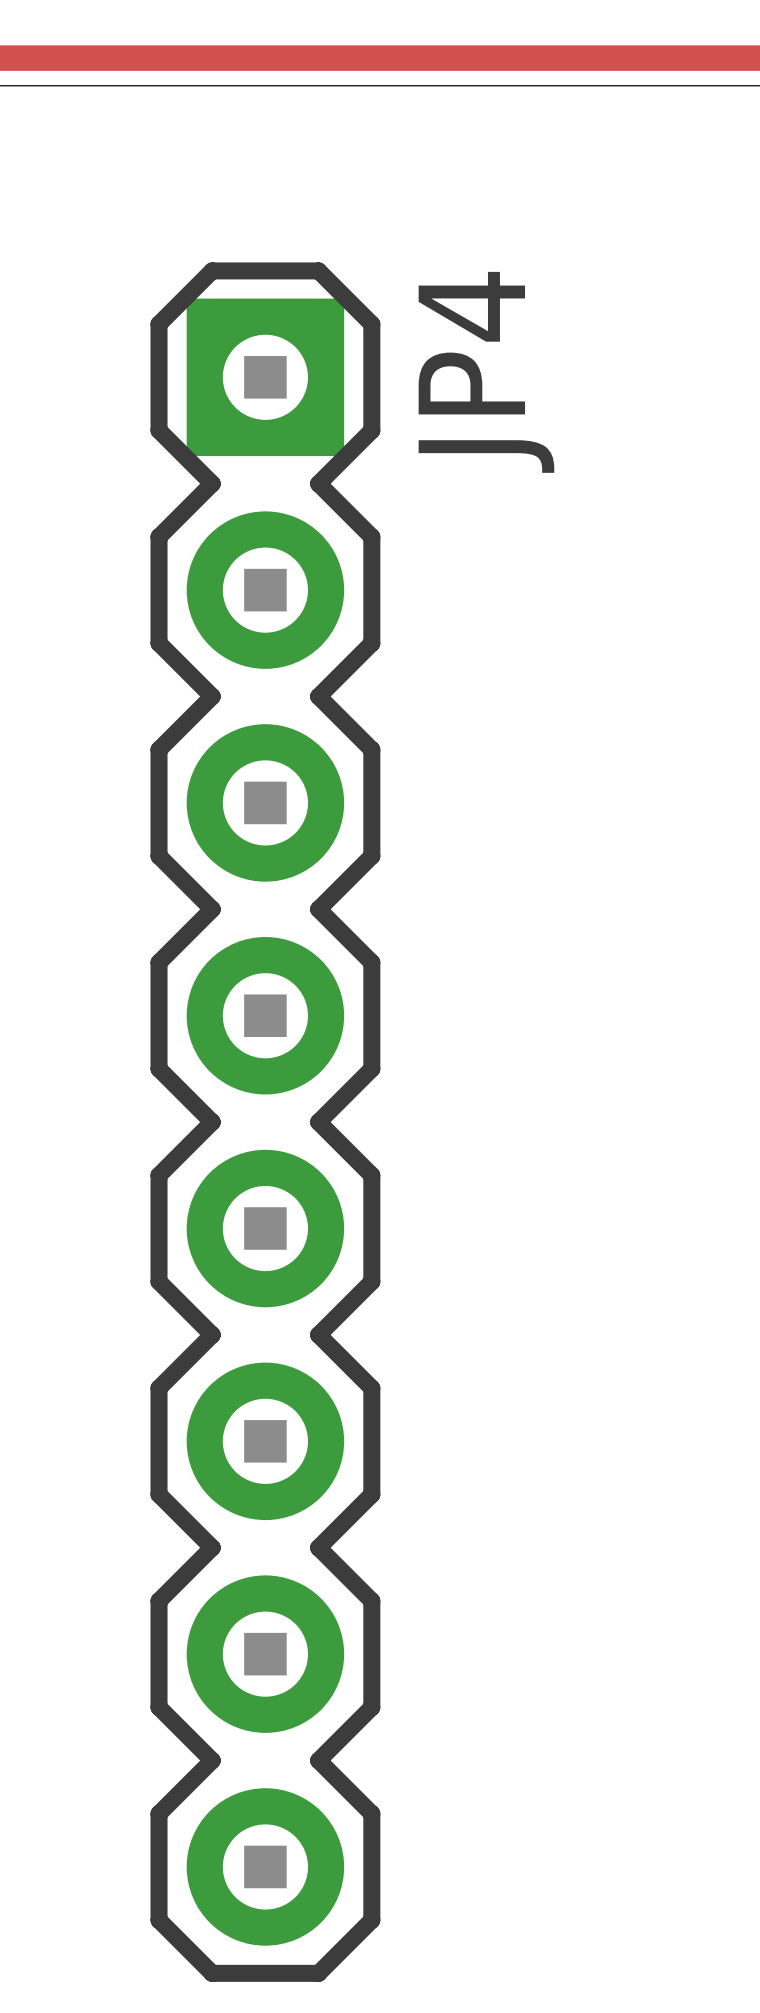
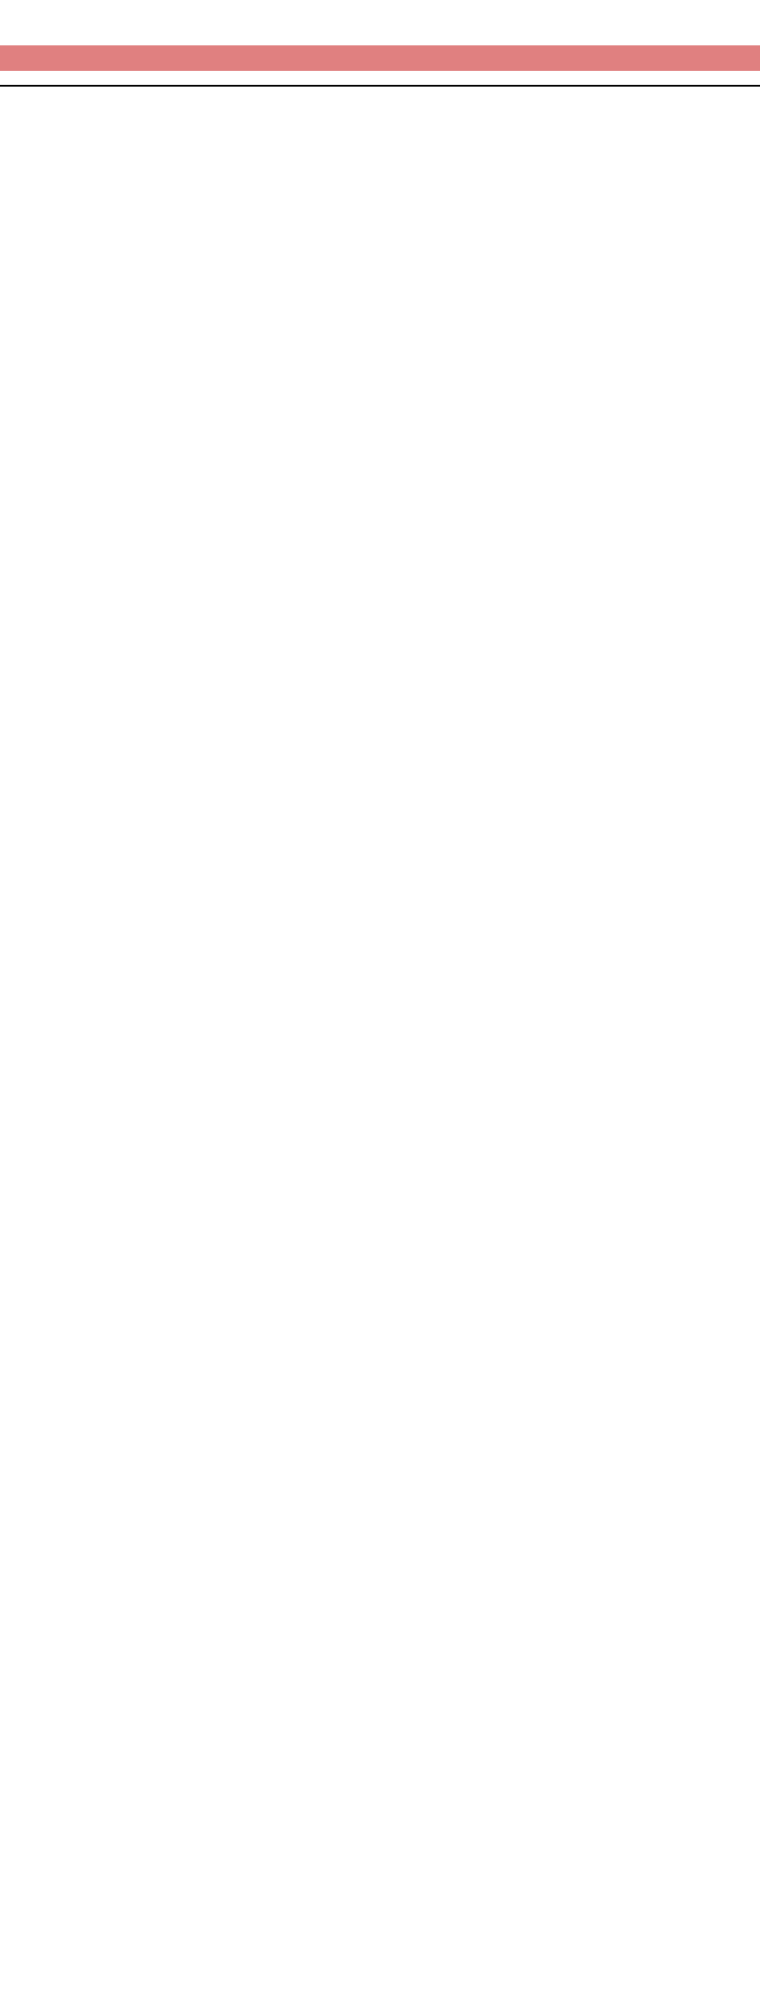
JP4: (265, 1122) -> none

